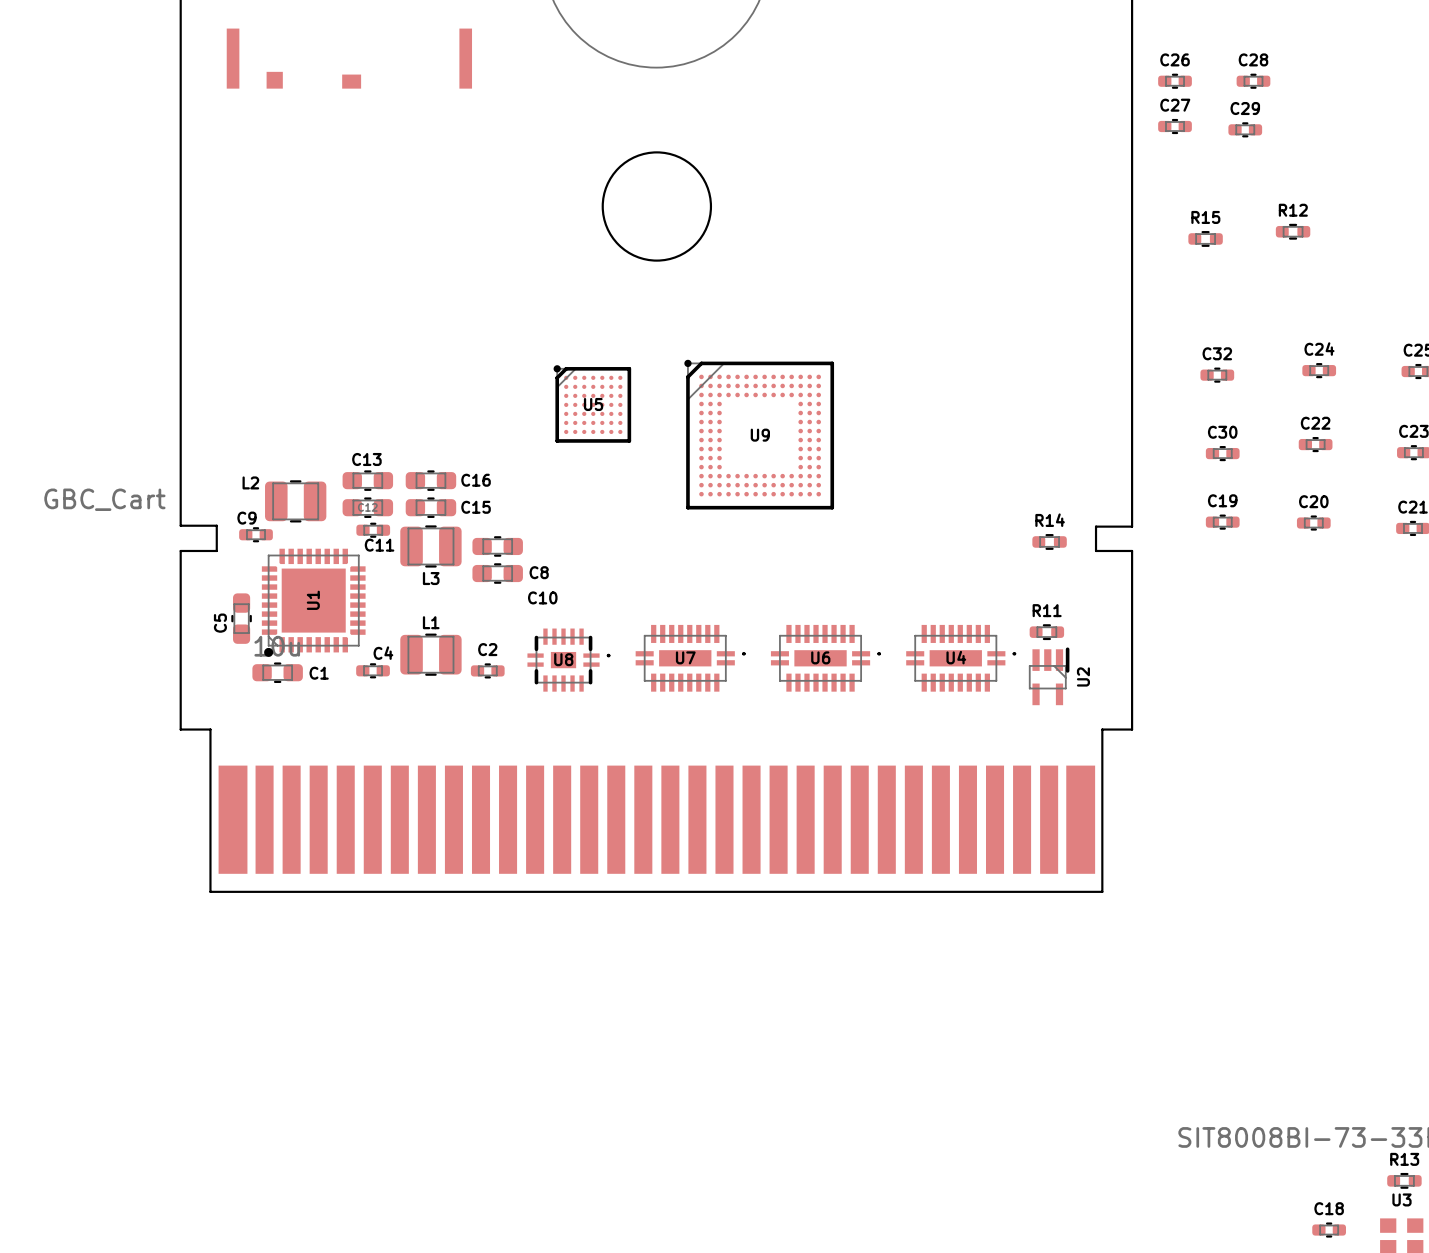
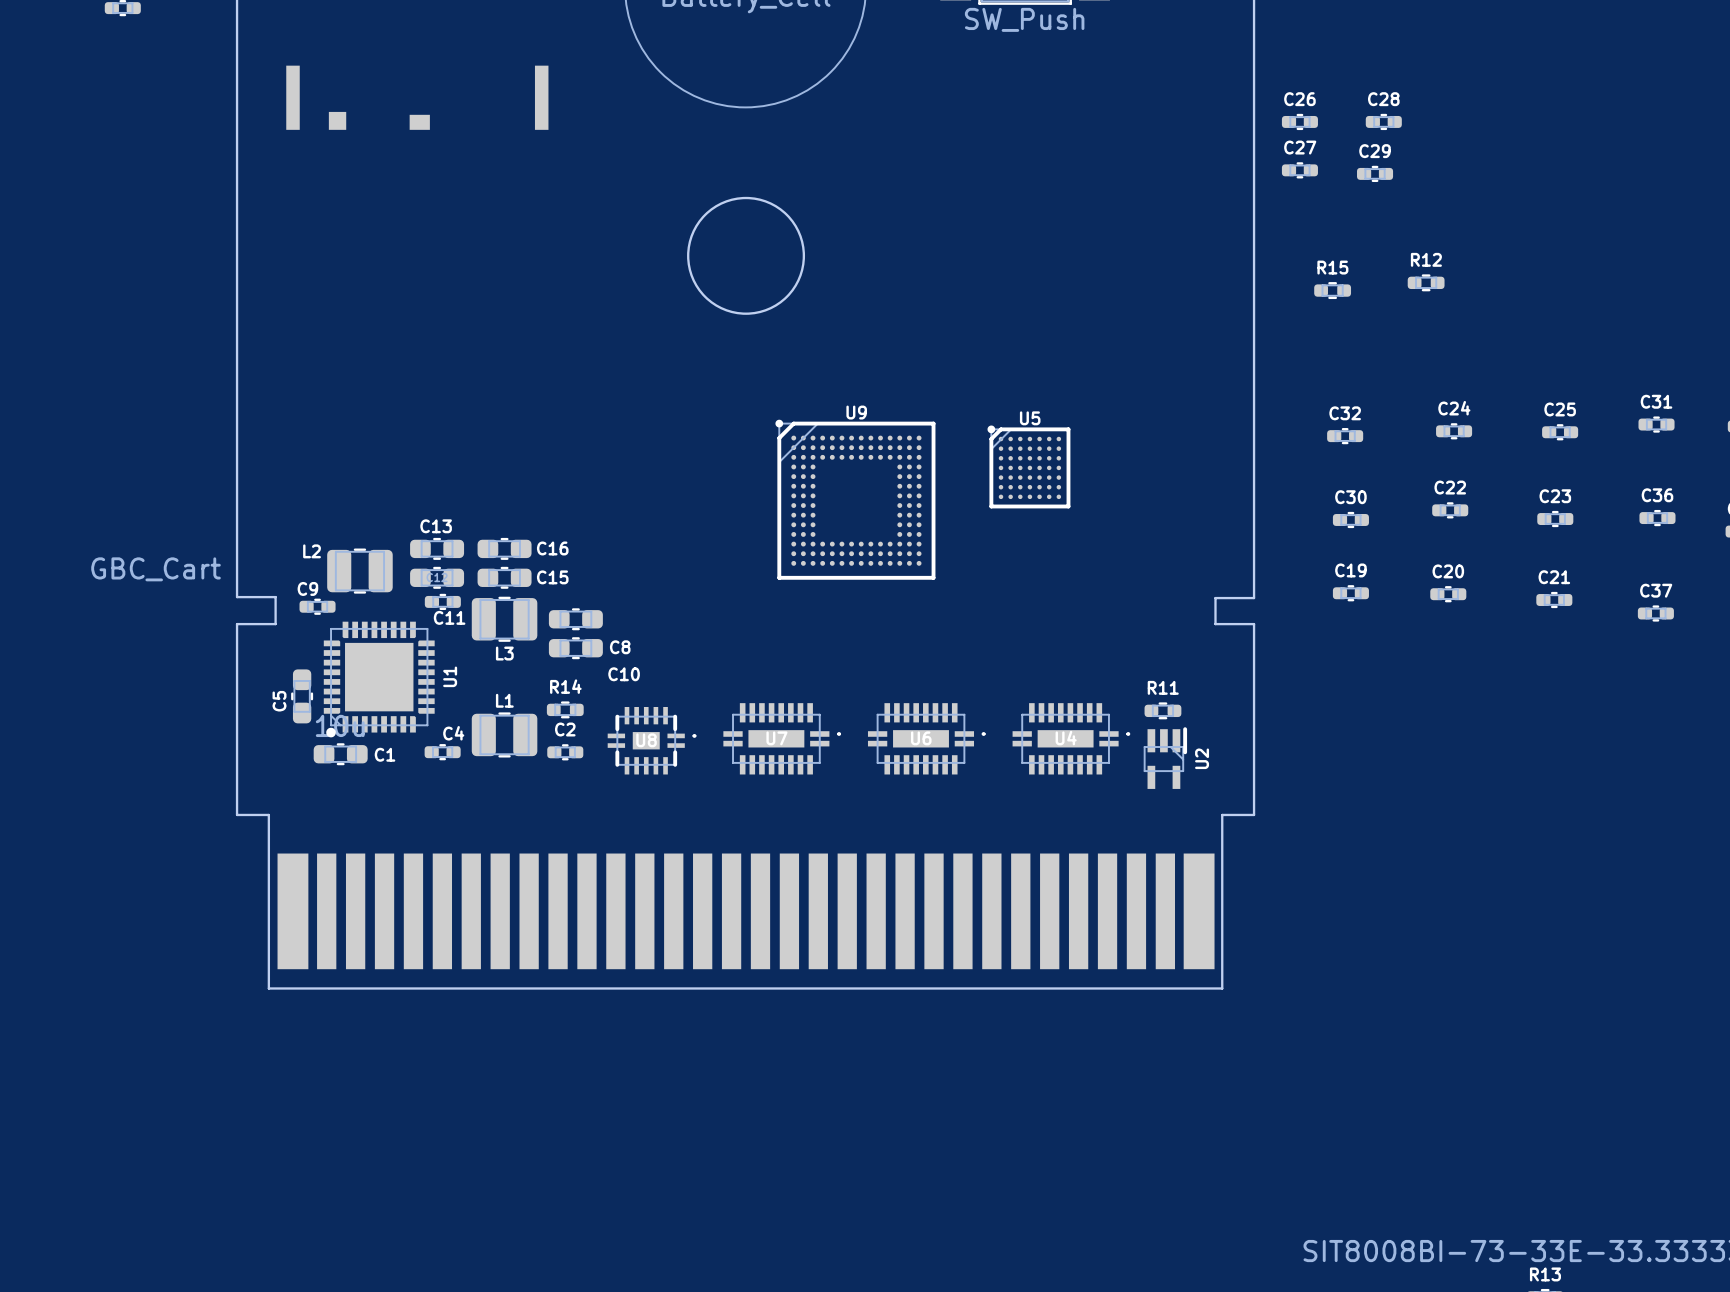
U5 position: (592, 403) -> (1028, 466)
U5 name position: U5 (593, 404) -> U5 (1030, 418)
U9 name position: U9 (760, 435) -> U9 (856, 412)
R14 position: (1049, 541) -> (565, 709)
U1 name position: U1 (313, 600) -> U1 (450, 676)

